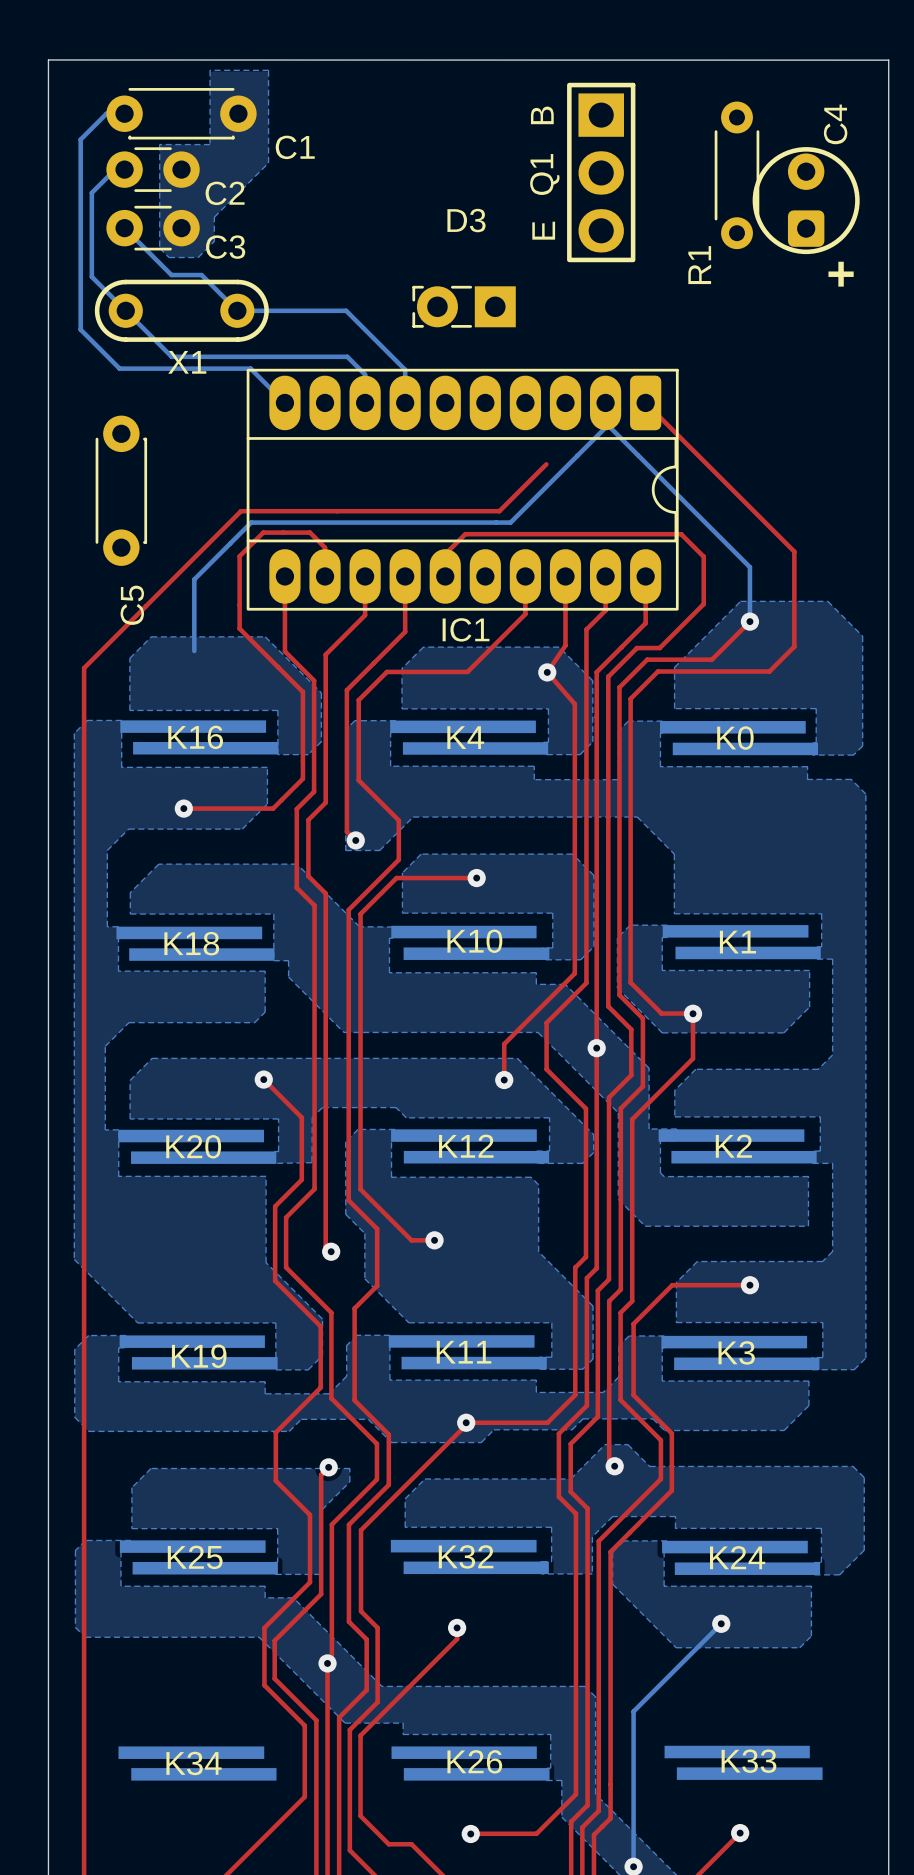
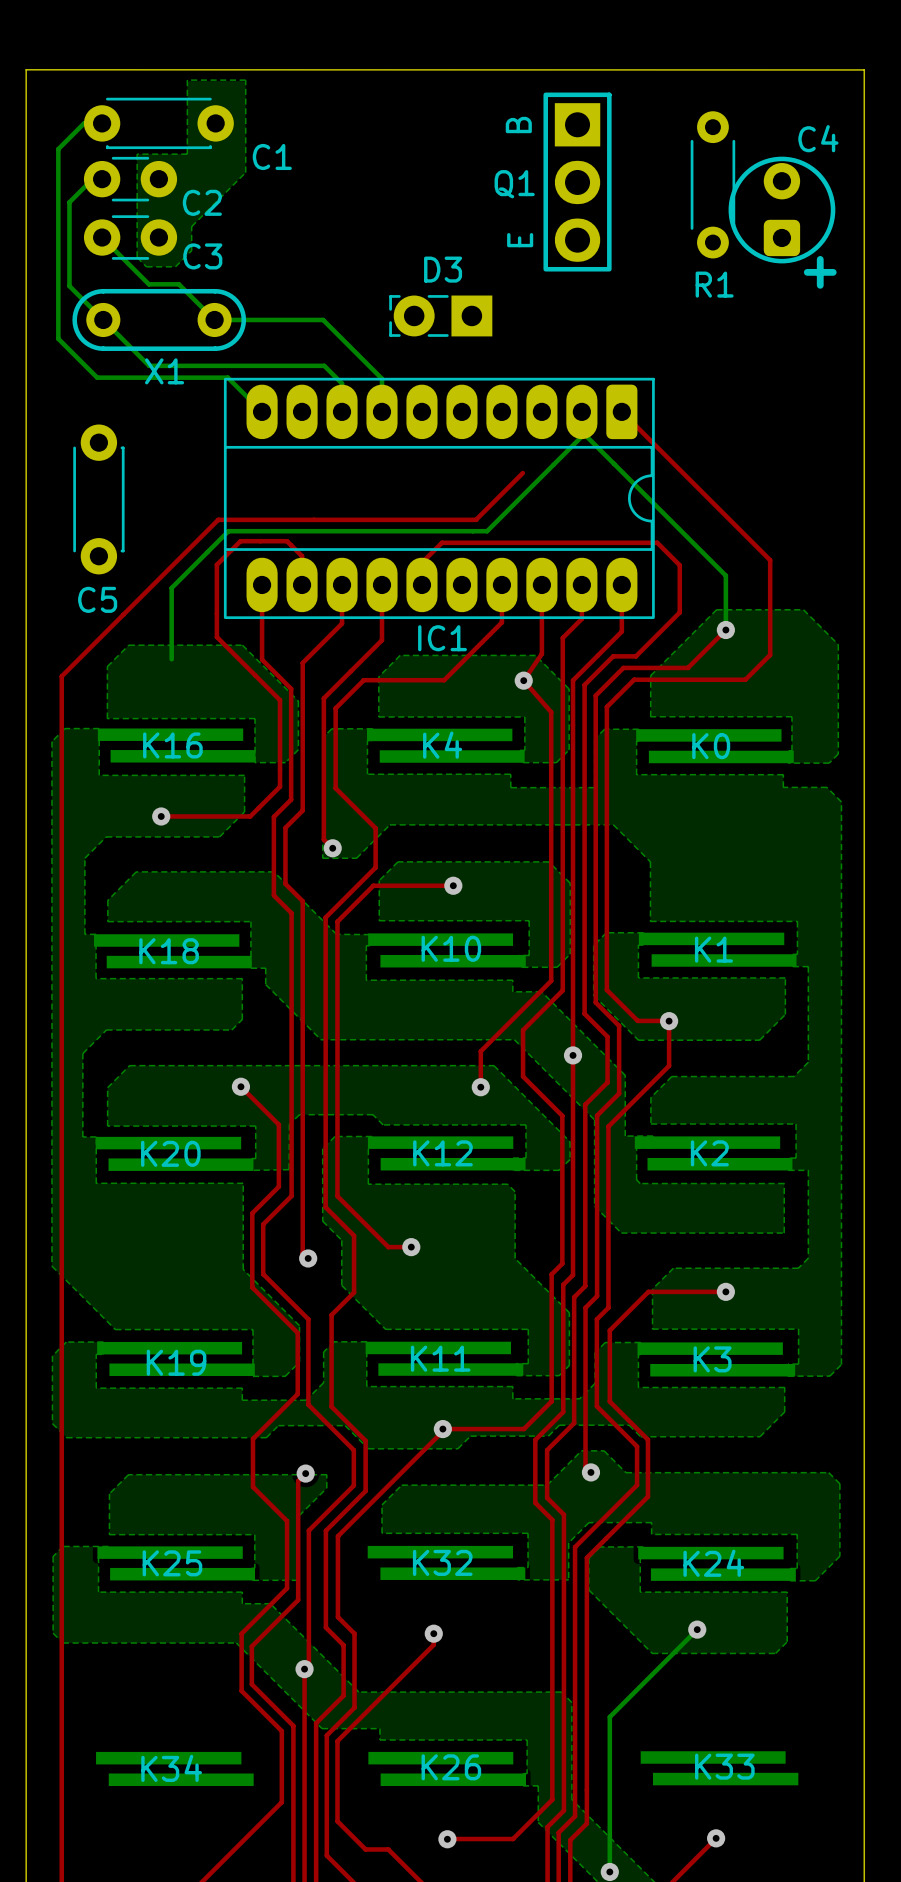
C4 name rotation: 0° (835, 124) -> 90° clockwise (818, 138)
Q1 name rotation: 0° (544, 174) -> 90° clockwise (514, 184)
D3 name position: D3 (466, 220) -> D3 (443, 269)
R1 name rotation: 0° (699, 265) -> 90° clockwise (714, 284)
C5 name rotation: 0° (132, 605) -> 90° clockwise (97, 599)

